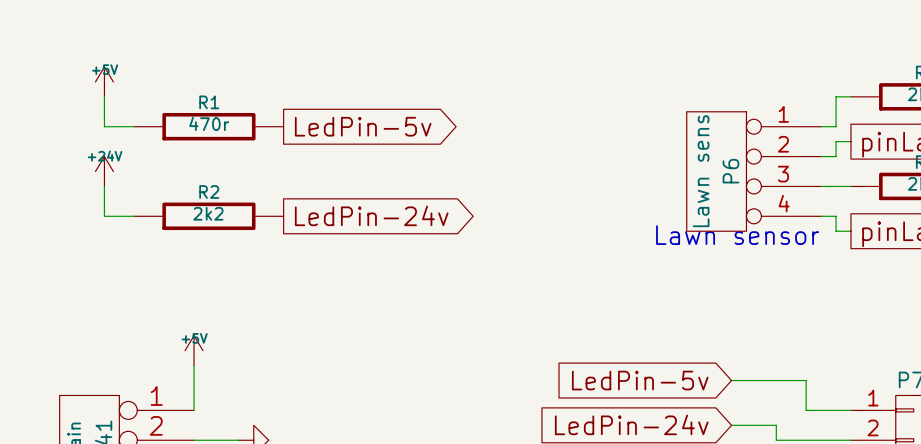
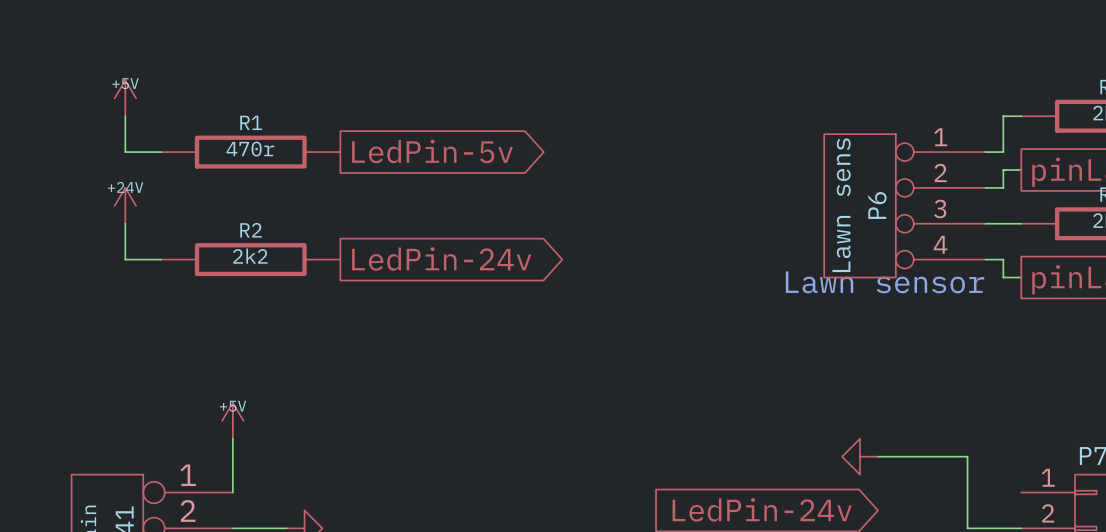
global label: LedPin-5v (640, 380) -> none
power symbol: none -> (860, 456)
wire: (806, 410) (850, 410) -> (967, 492) (967, 528)
wire: (731, 425) (776, 425) (776, 440) (806, 440) -> none

